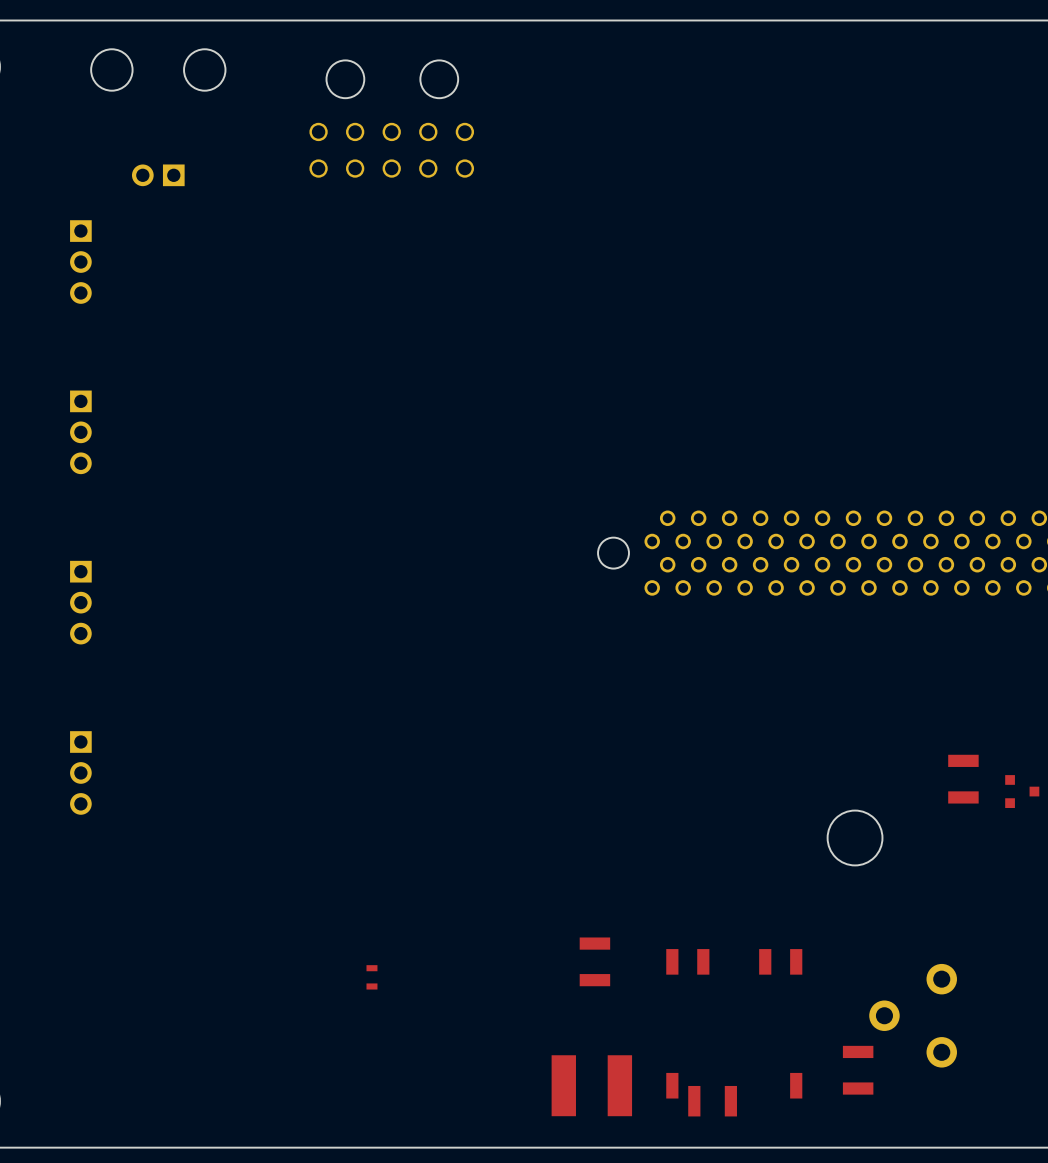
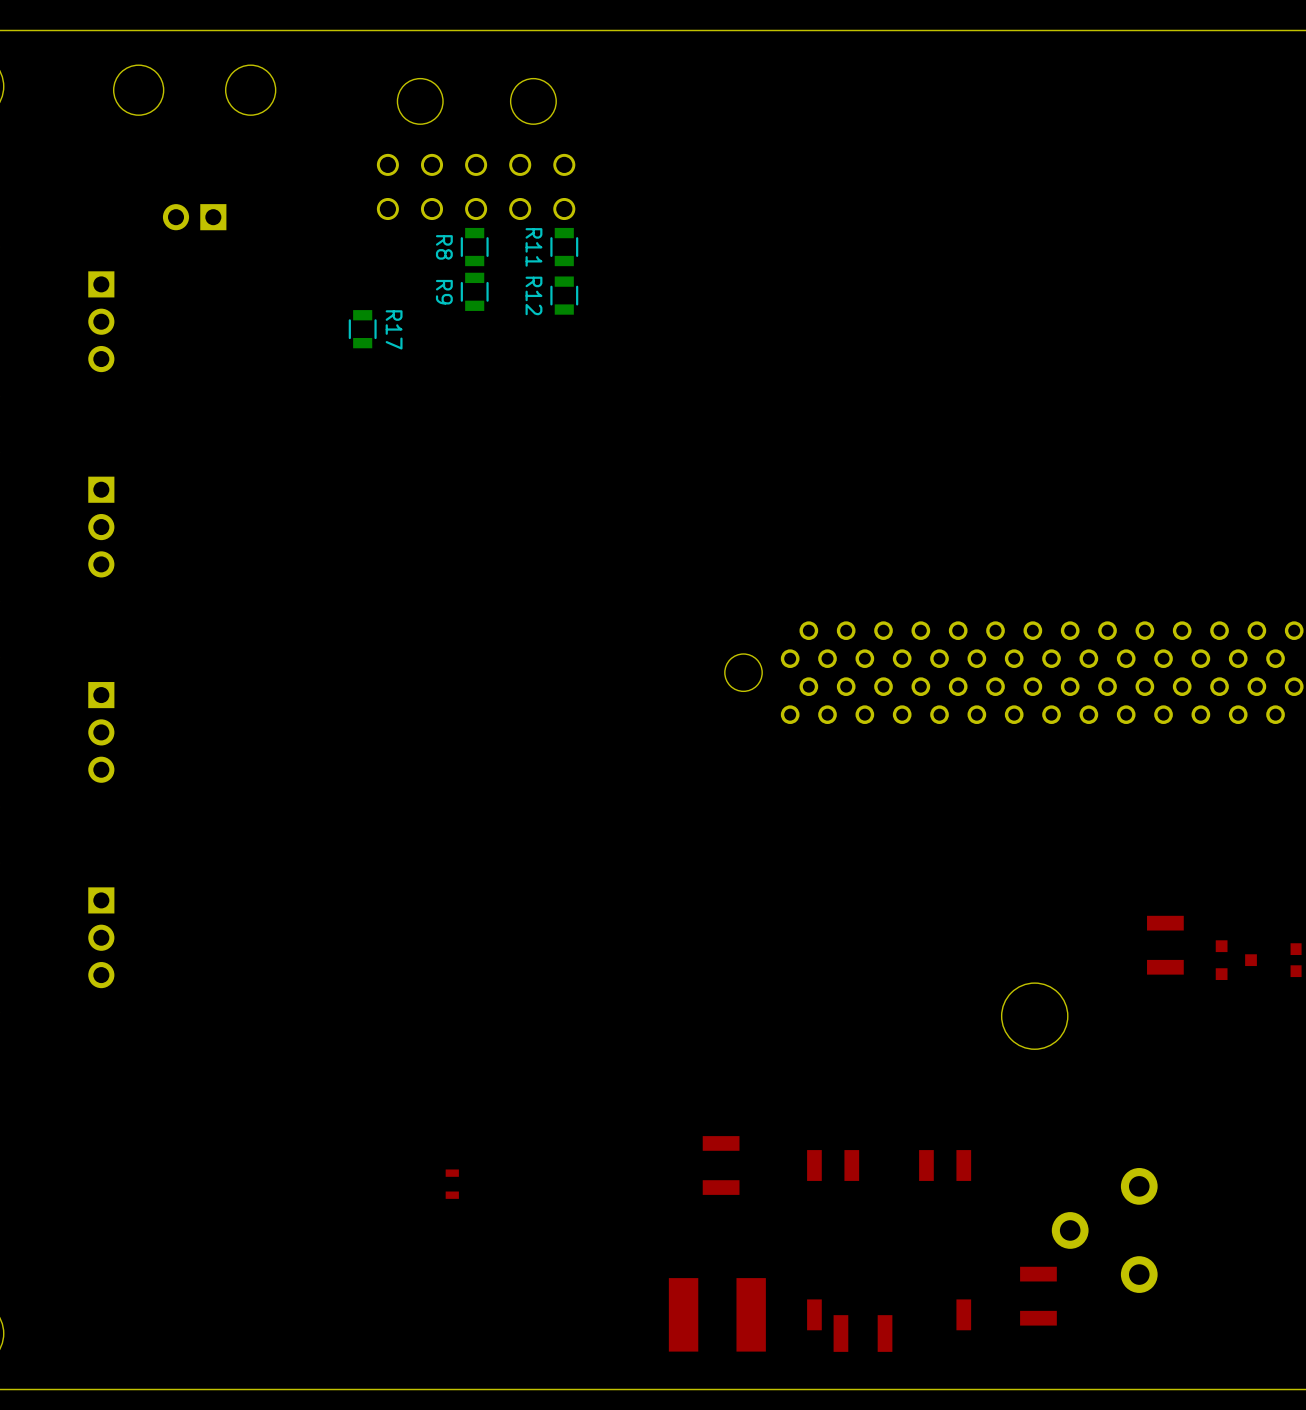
R8: none -> (474, 247)
R11: none -> (564, 247)
R9: none -> (474, 291)
R12: none -> (564, 295)
R17: none -> (362, 329)

